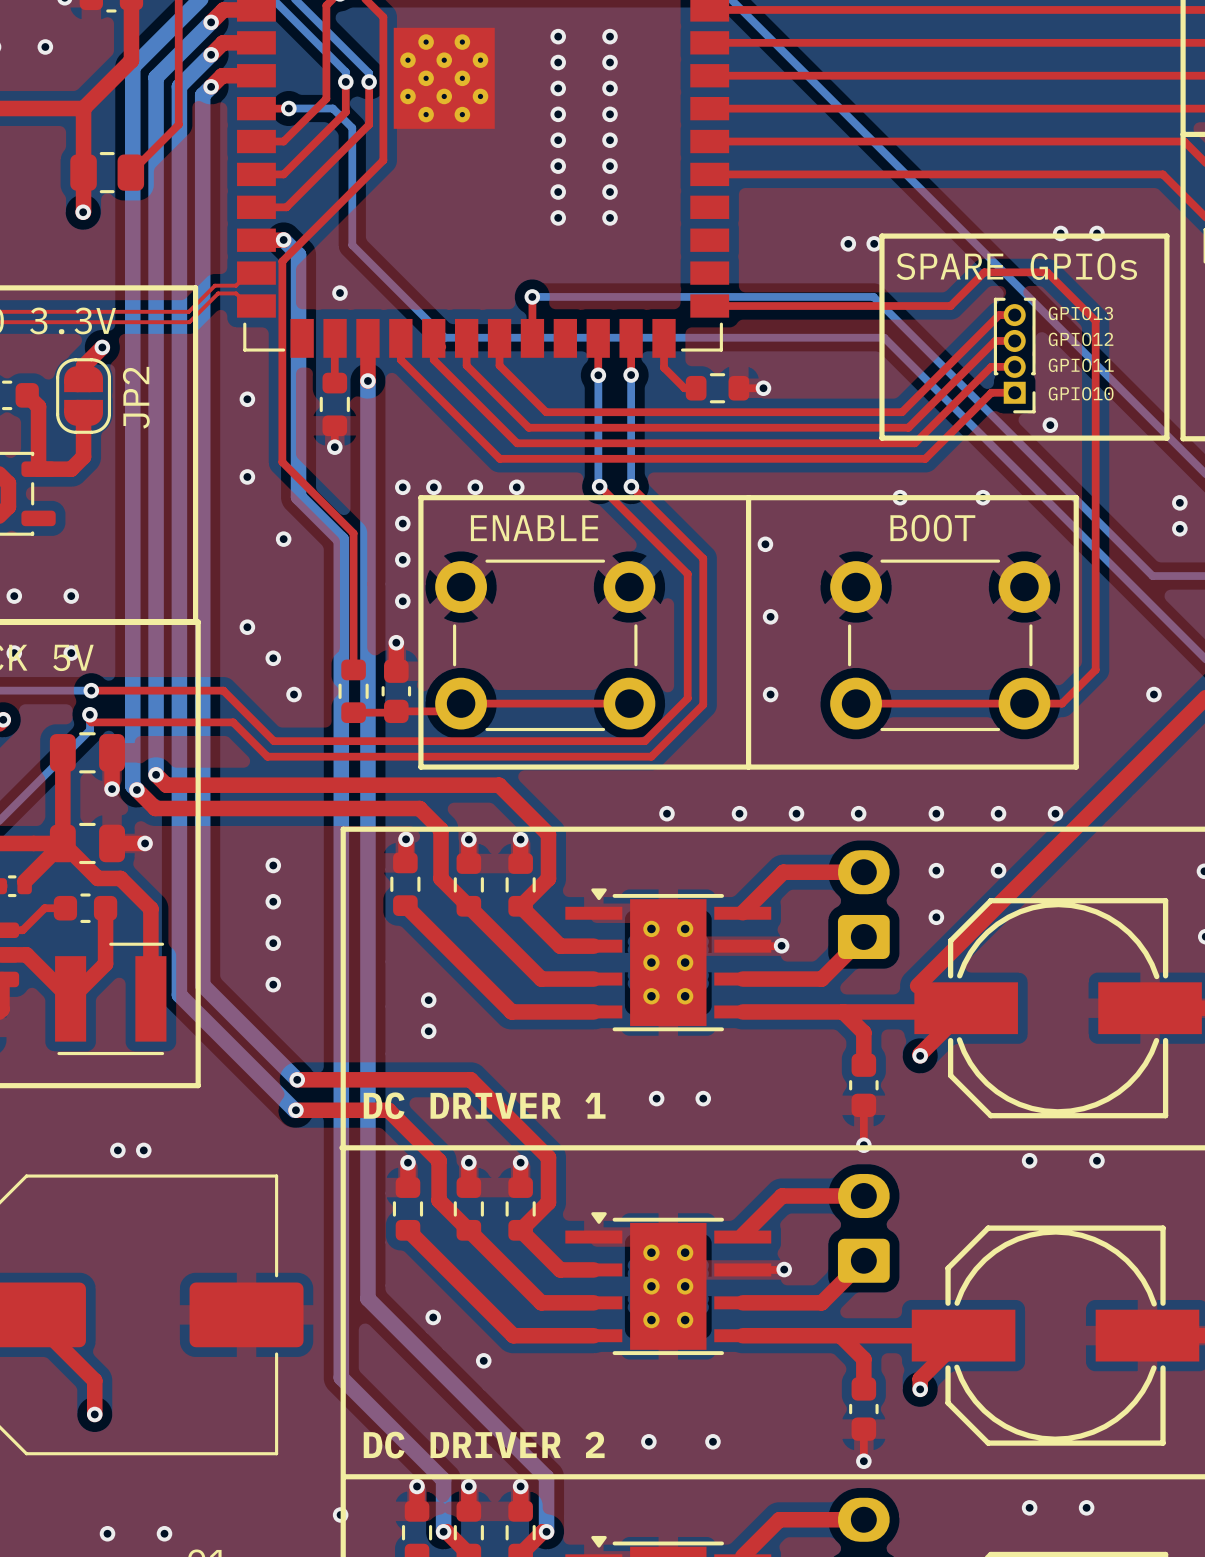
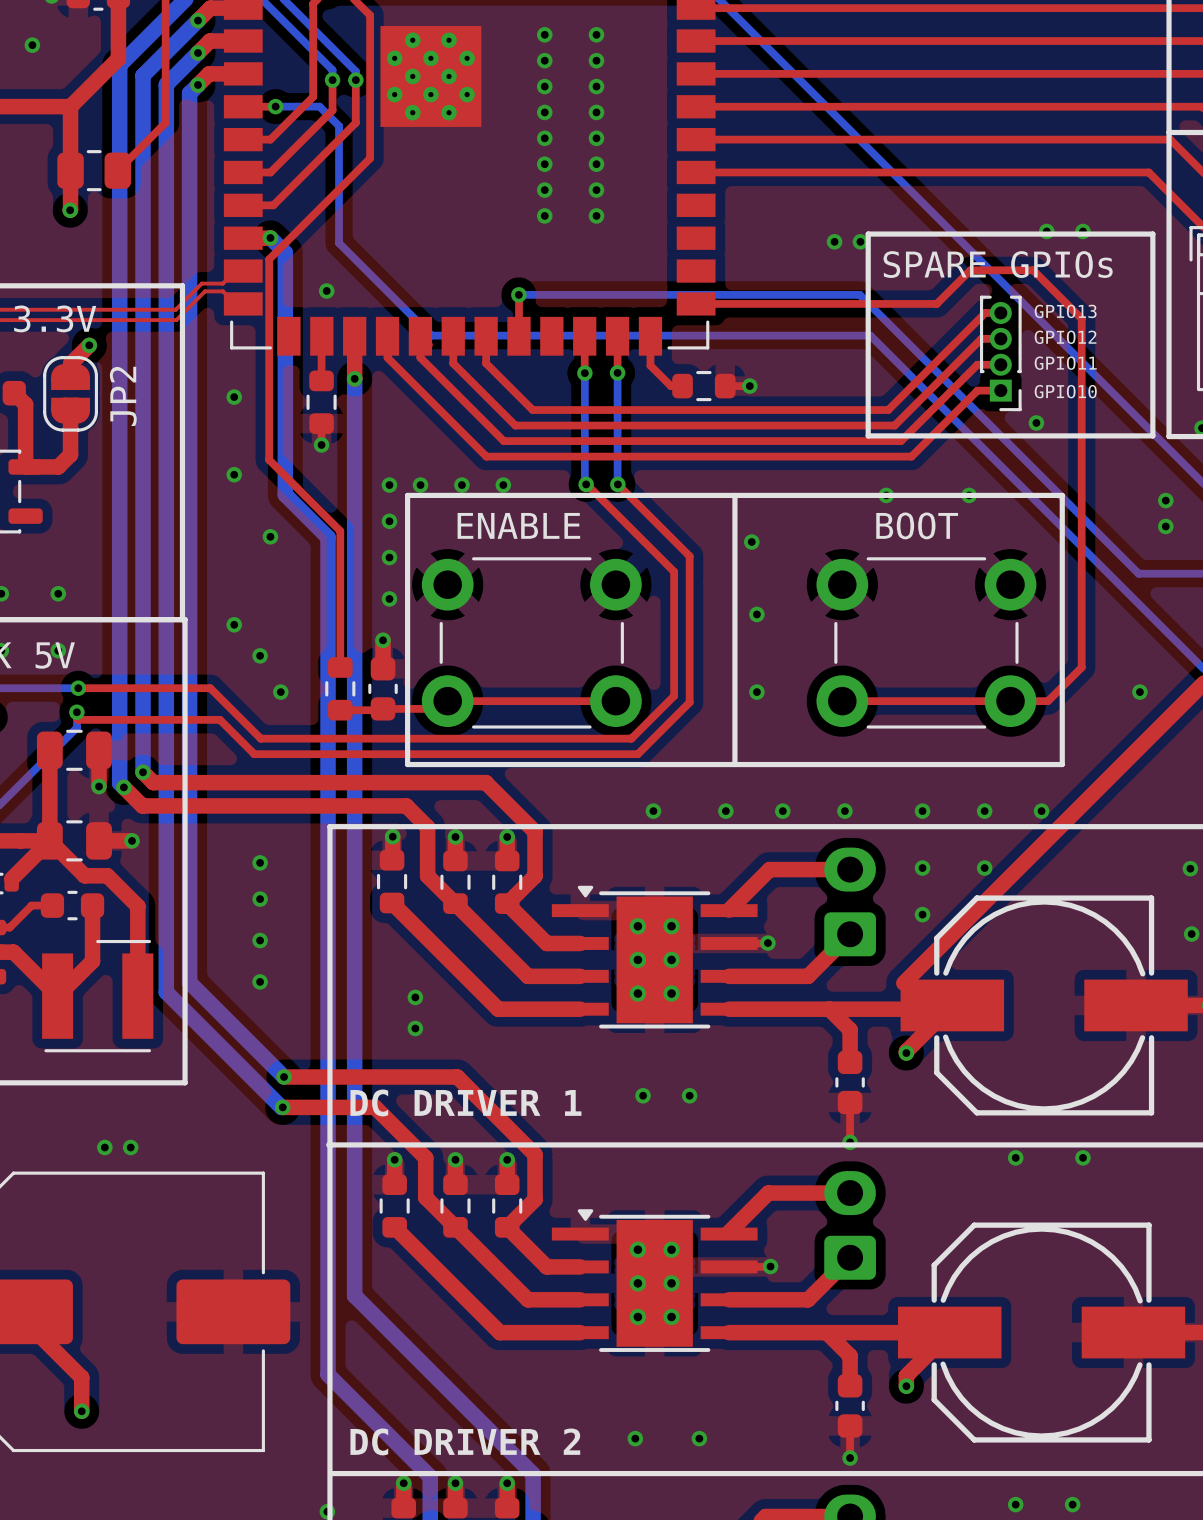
via: (433, 1317) -> none
via: (483, 1360) -> none

